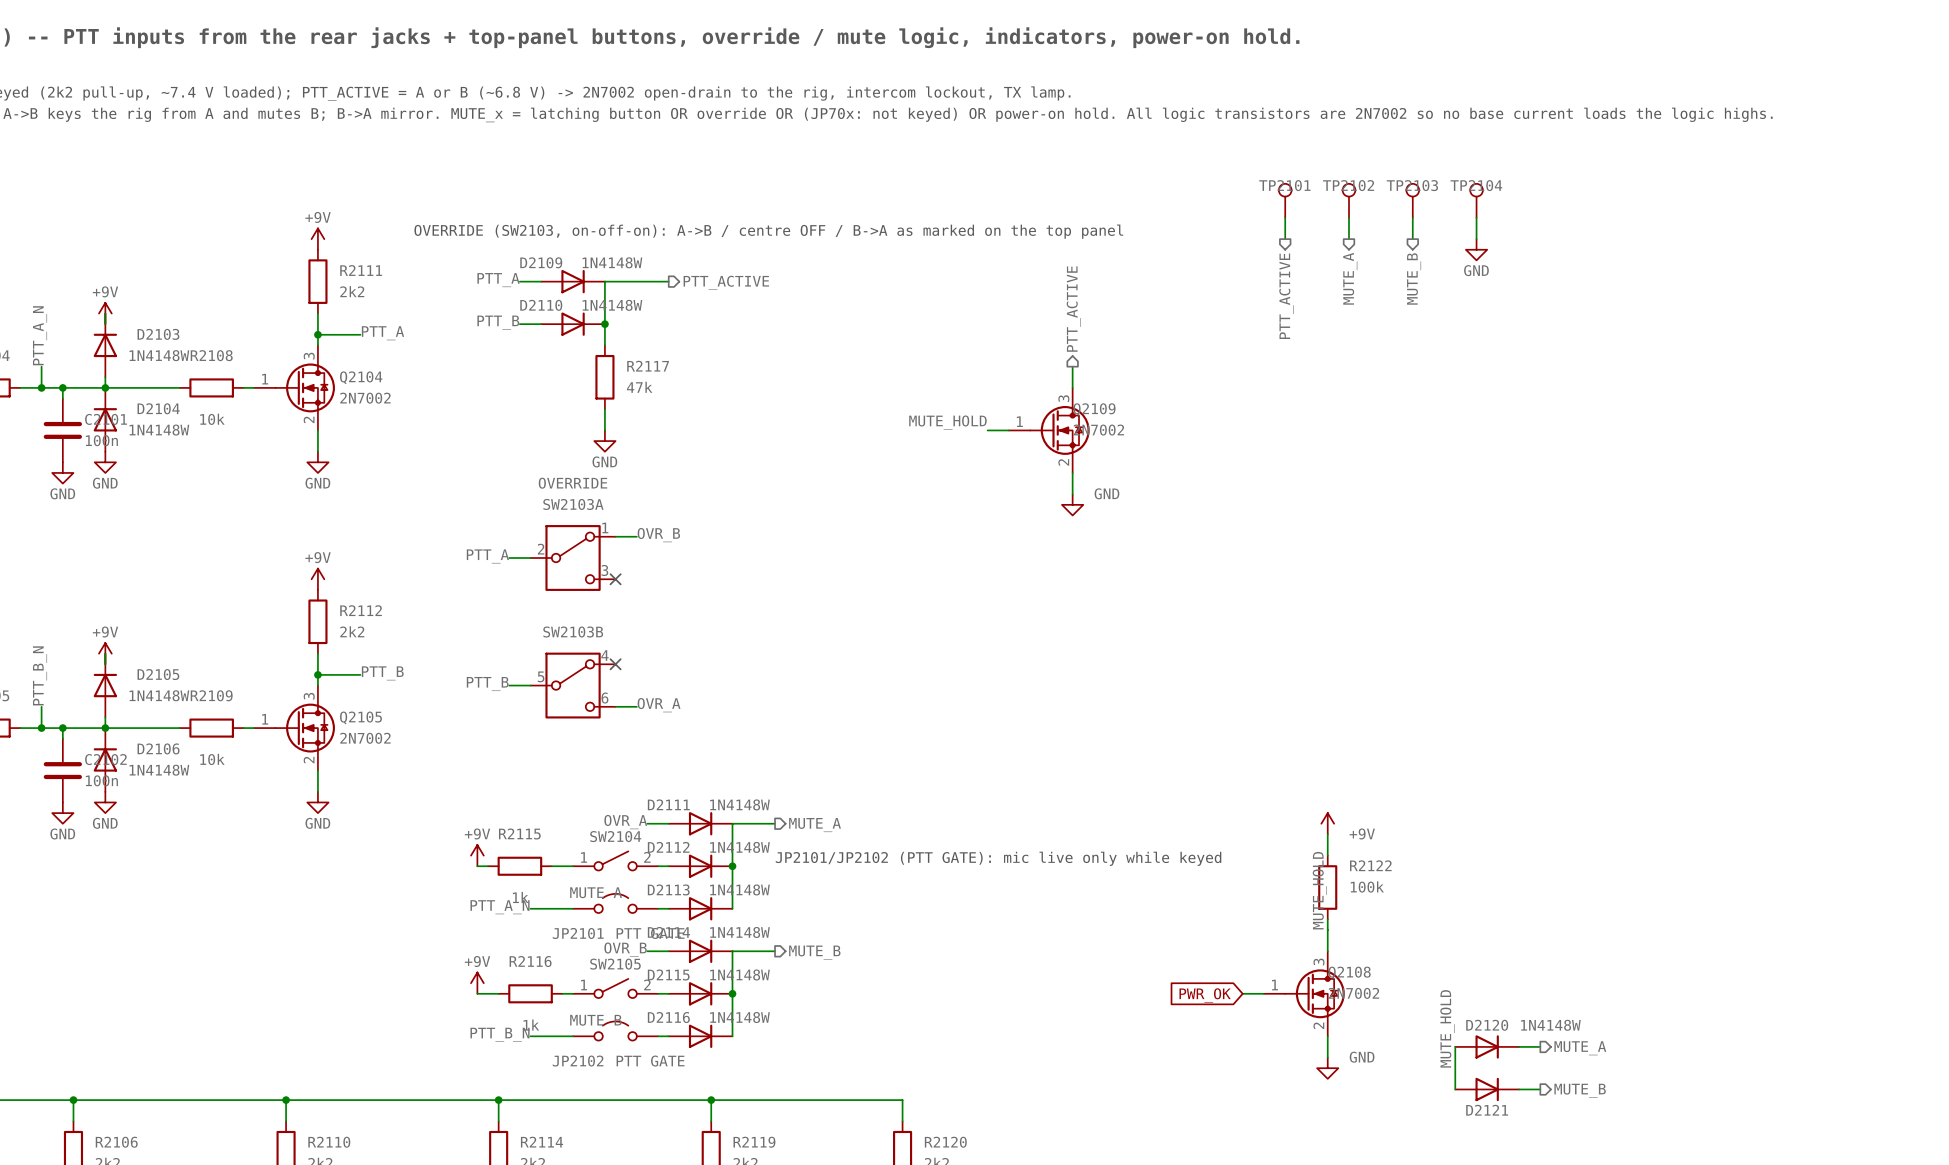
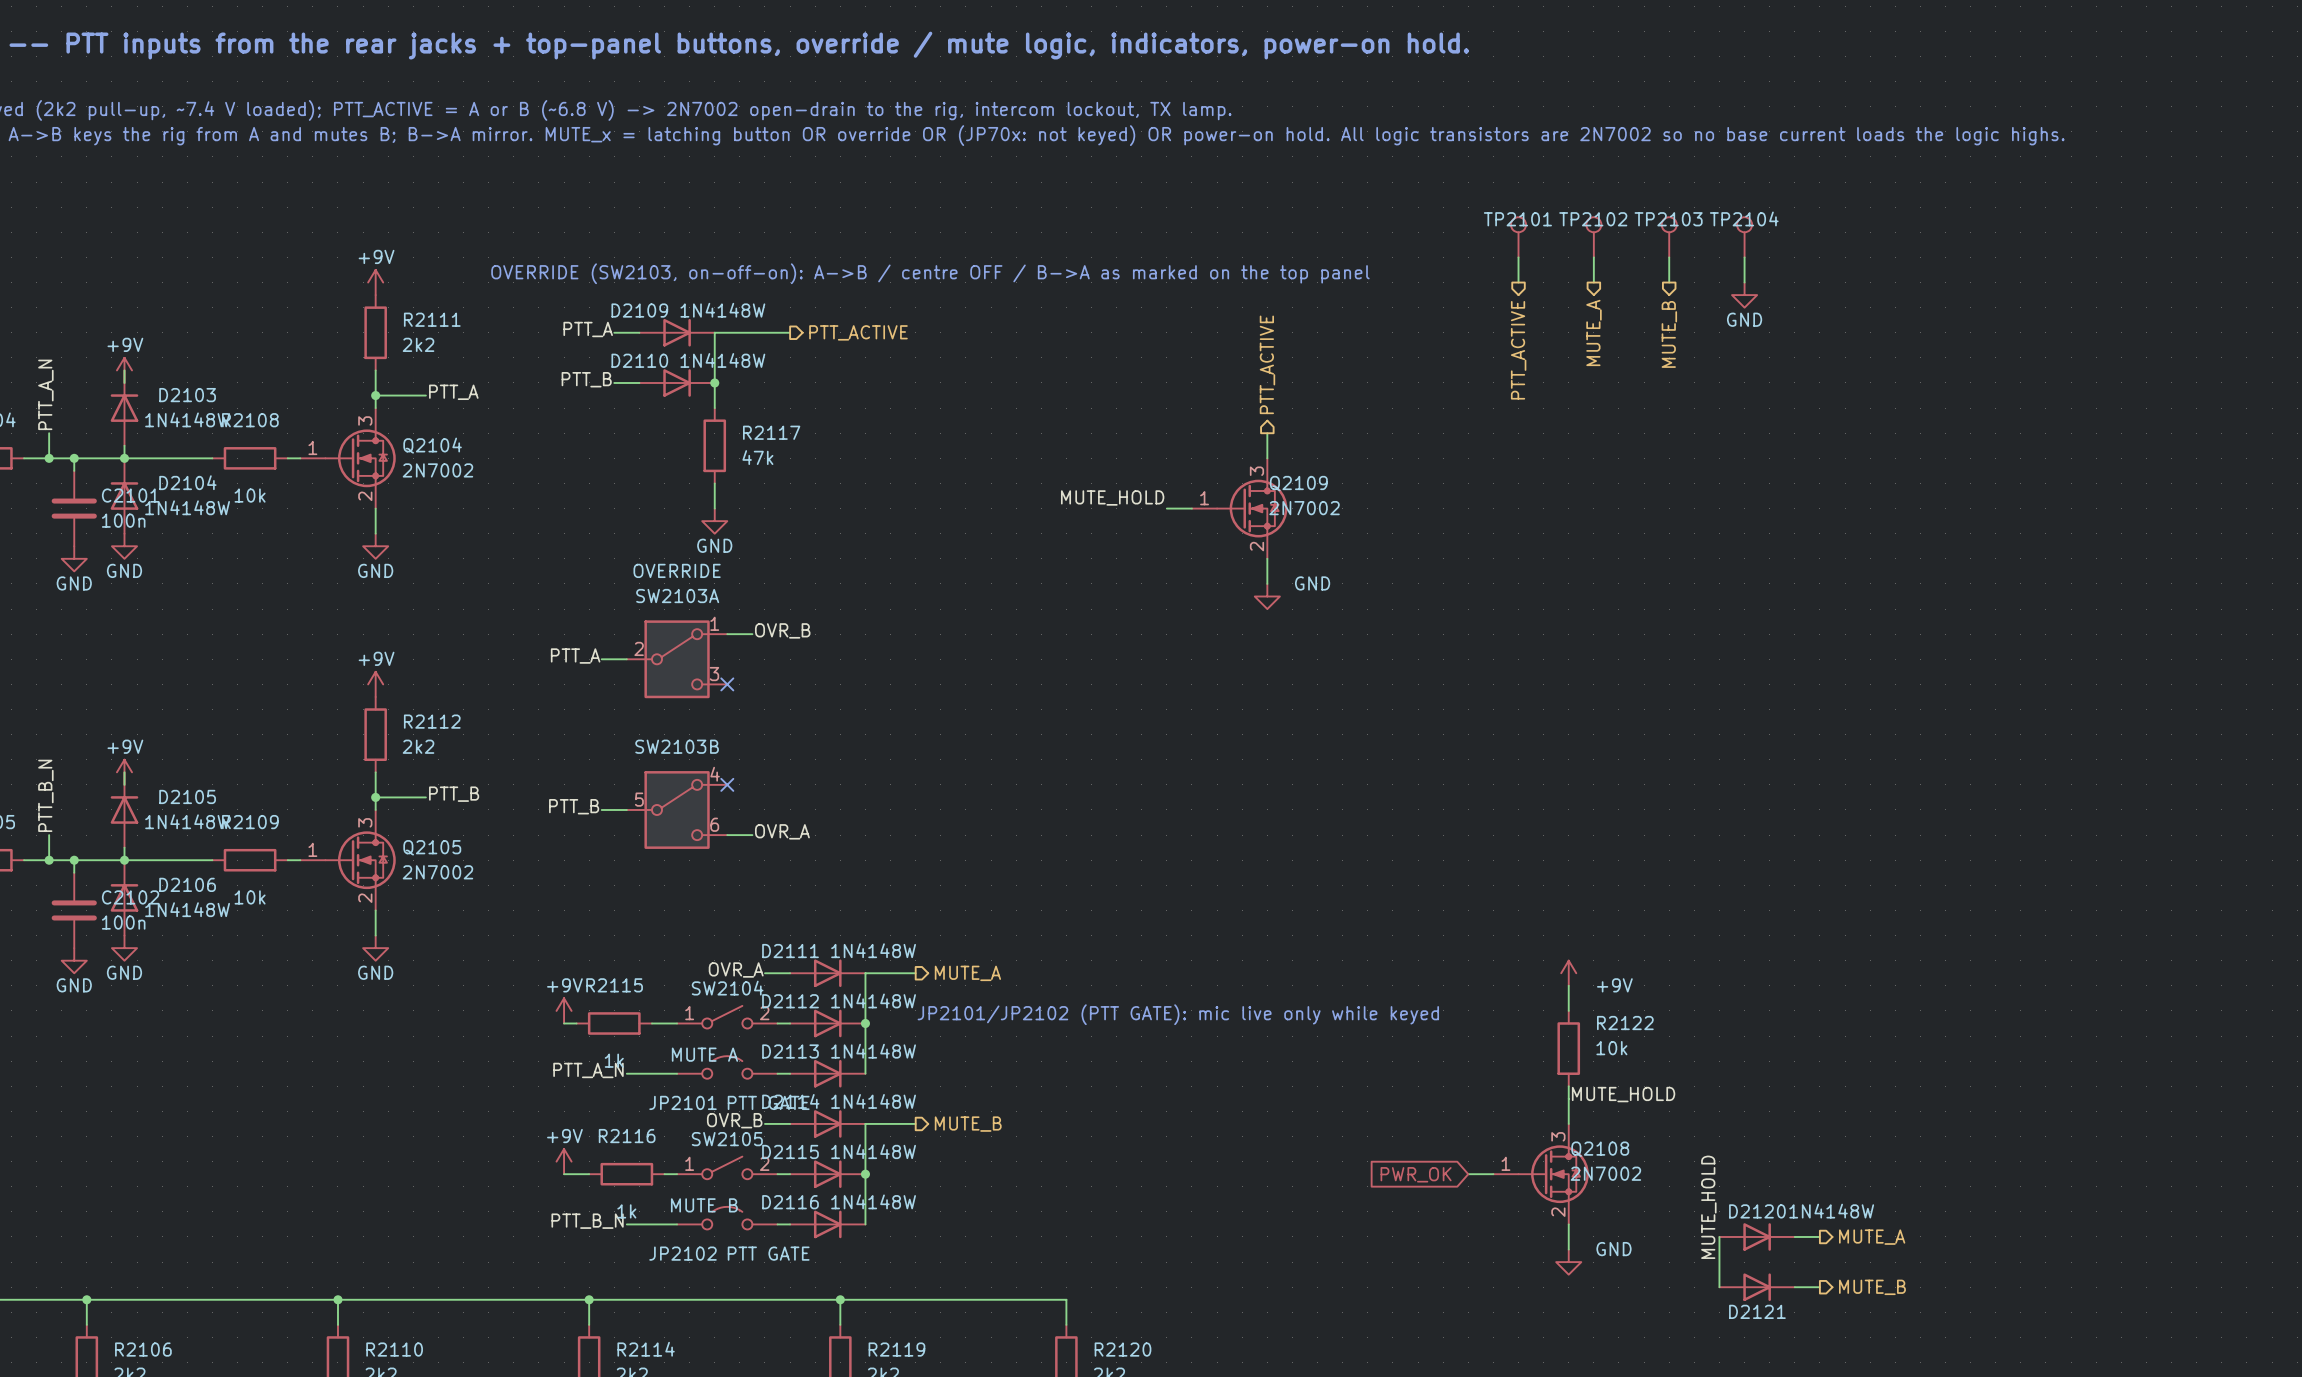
R2122 value: 100k (1367, 886) -> 10k (1611, 1048)
label rotation: 0° (1319, 890) -> 90° clockwise (1623, 1094)

